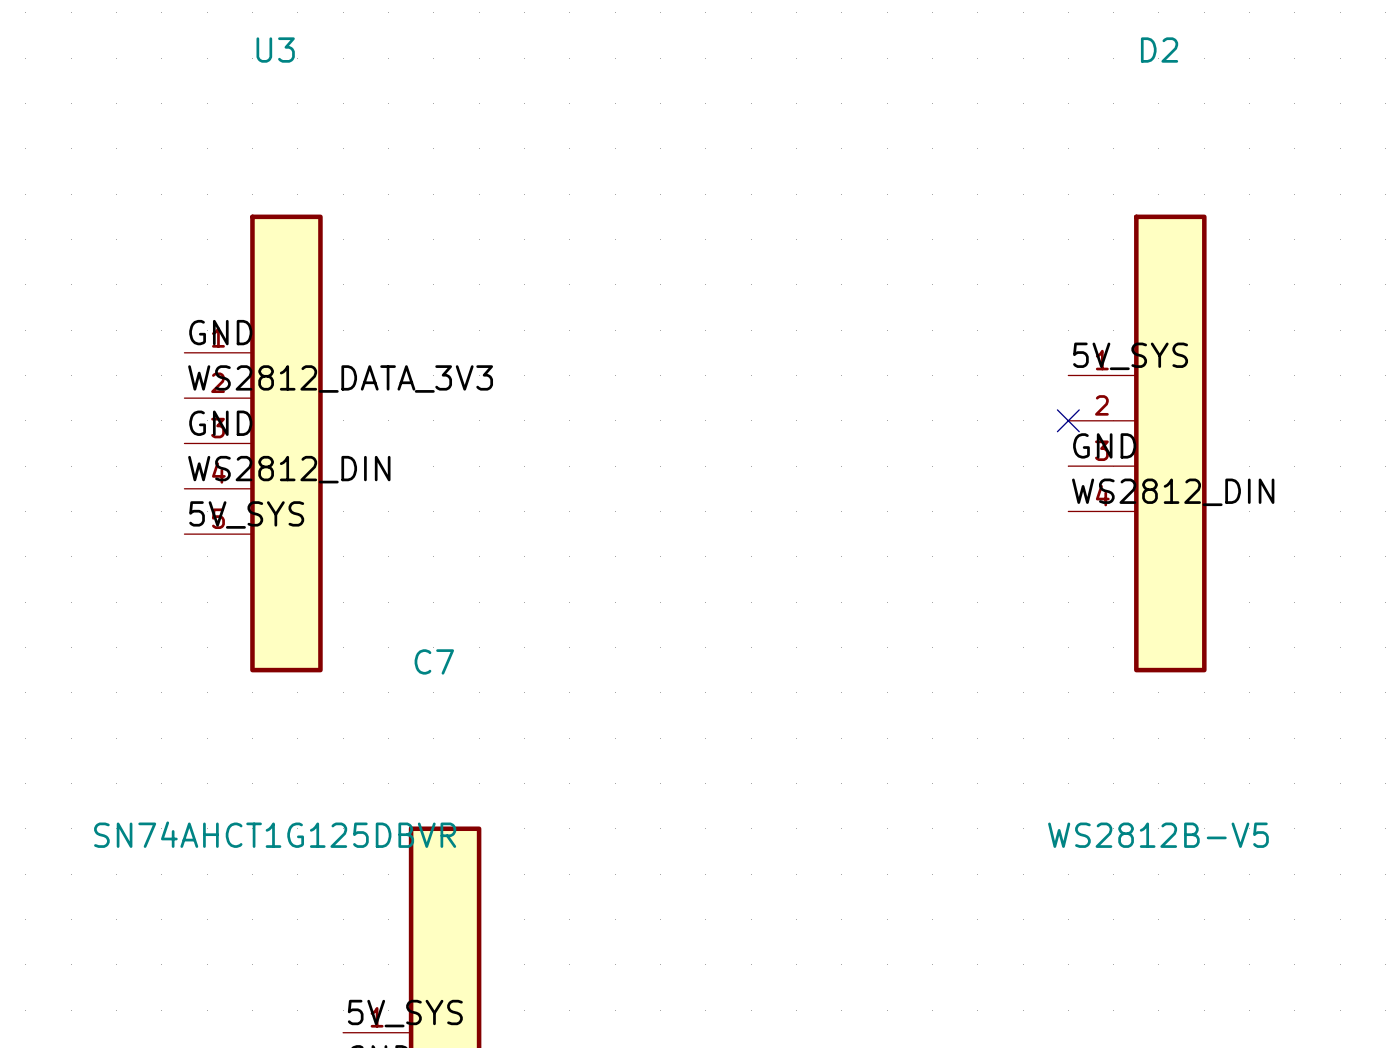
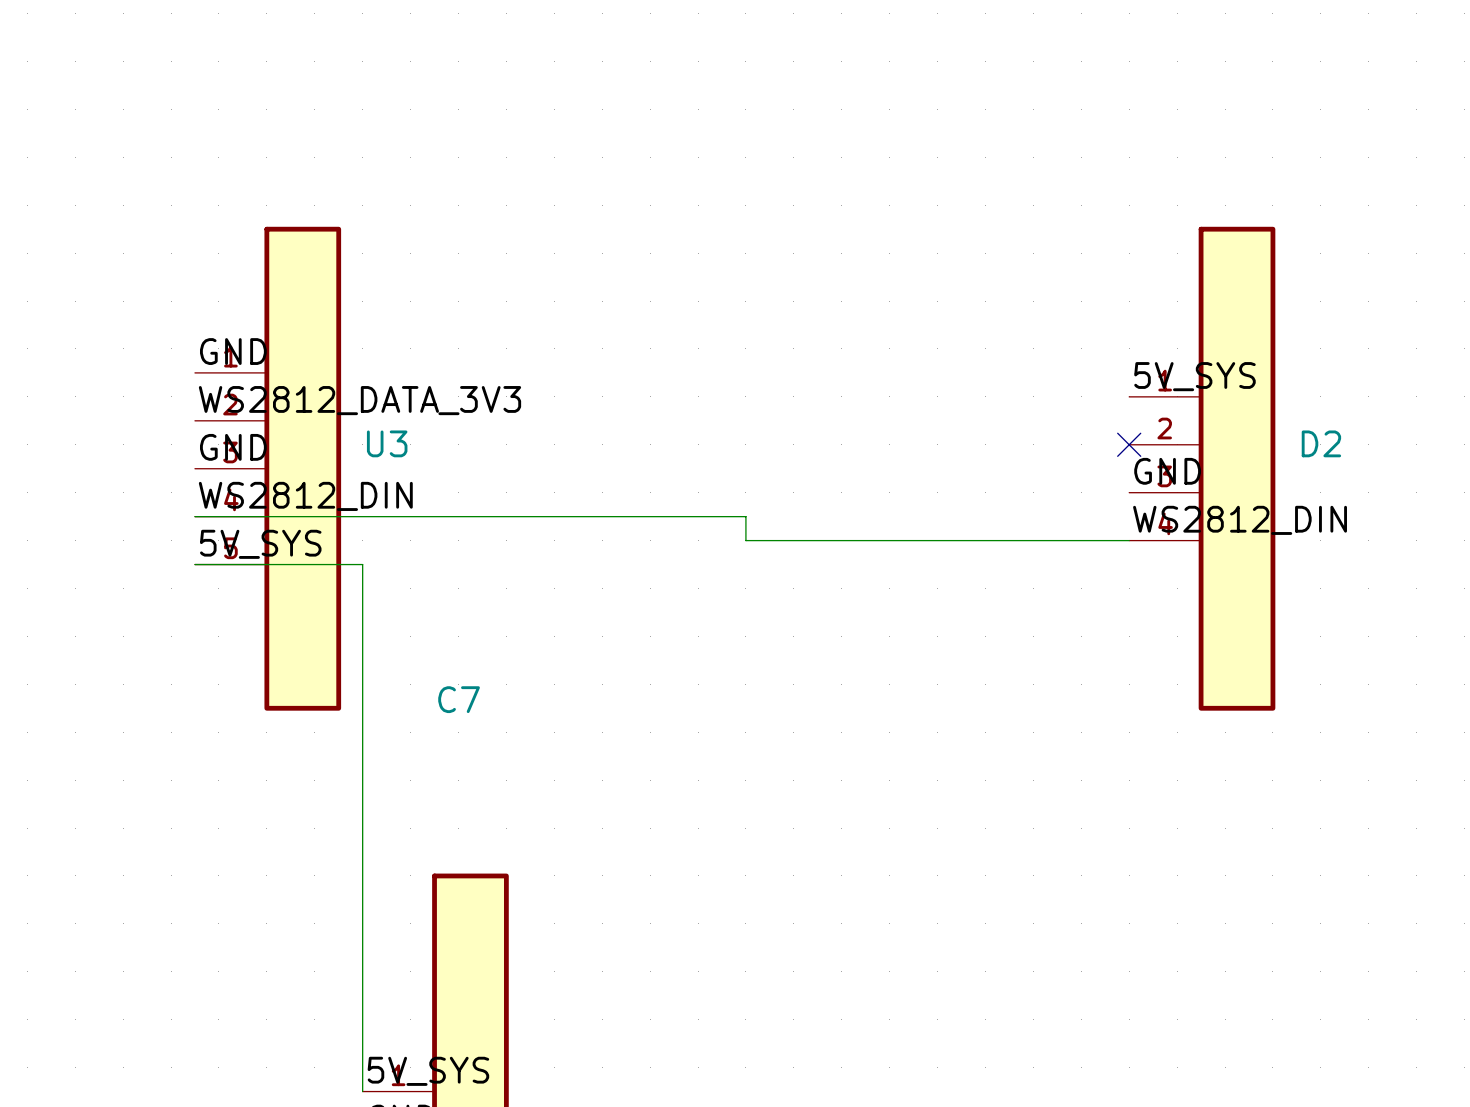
U3 name position: U3 (275, 50) -> U3 (387, 443)
D2 name position: D2 (1159, 50) -> D2 (1321, 443)
wire: none -> (194, 516) (745, 516) (745, 540) (1129, 540)
wire: none -> (194, 564) (362, 564) (362, 1091)
U3 value: SN74AHCT1G125DBVR (275, 834) -> none
D2 value: WS2812B-V5 (1158, 835) -> none

